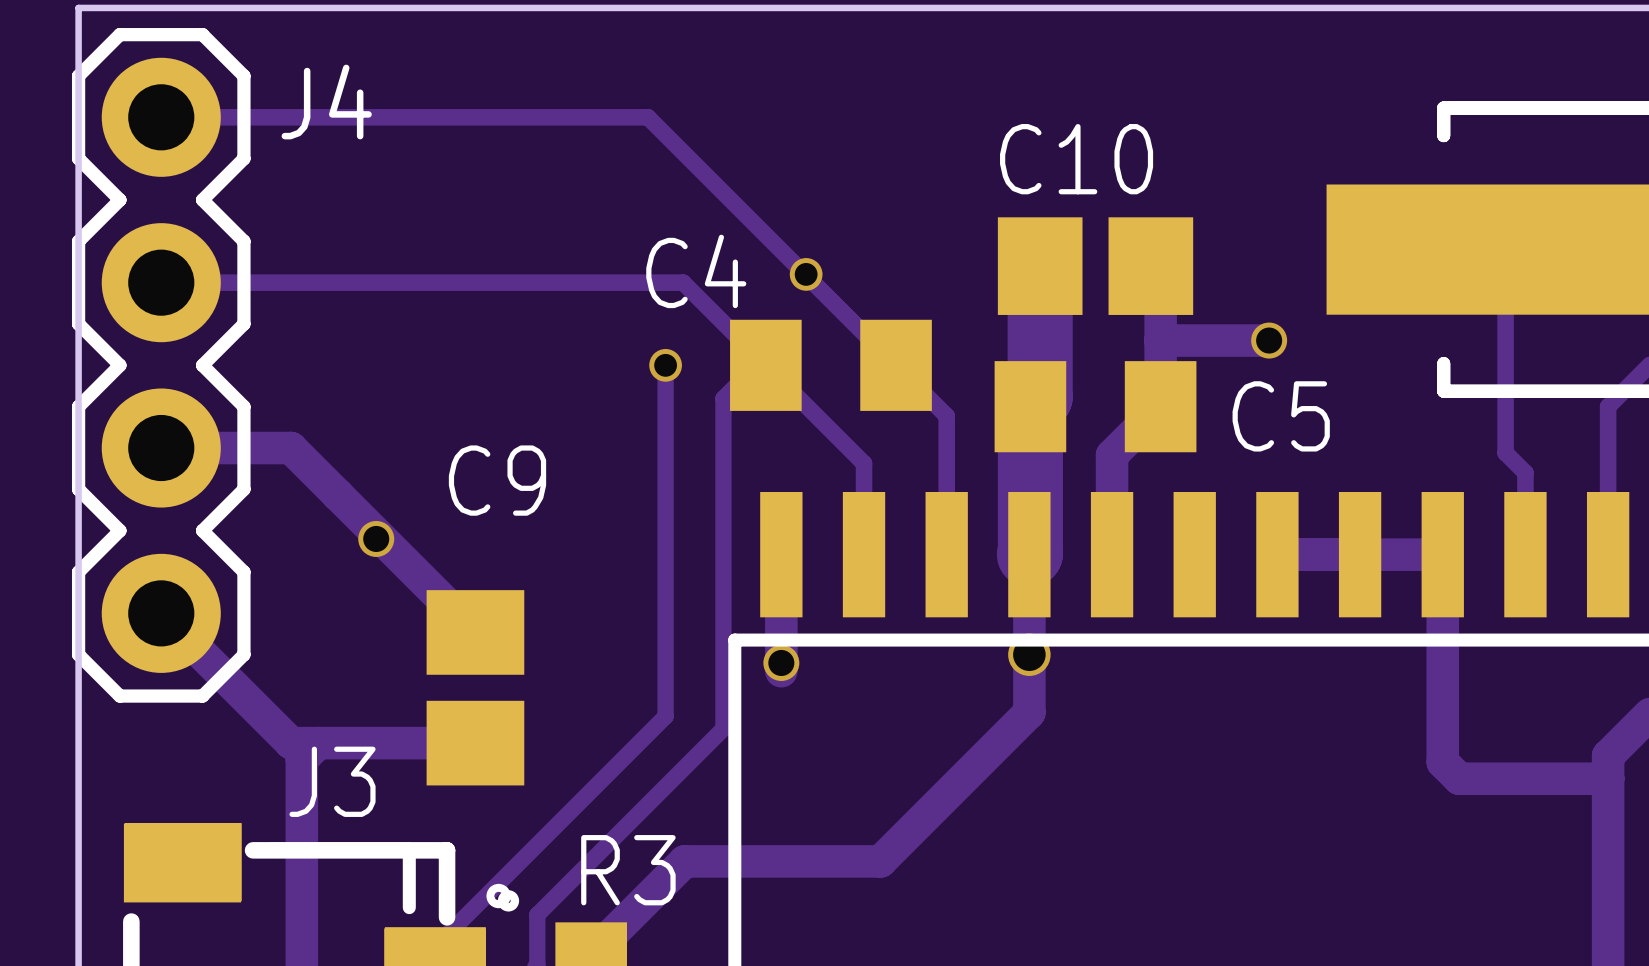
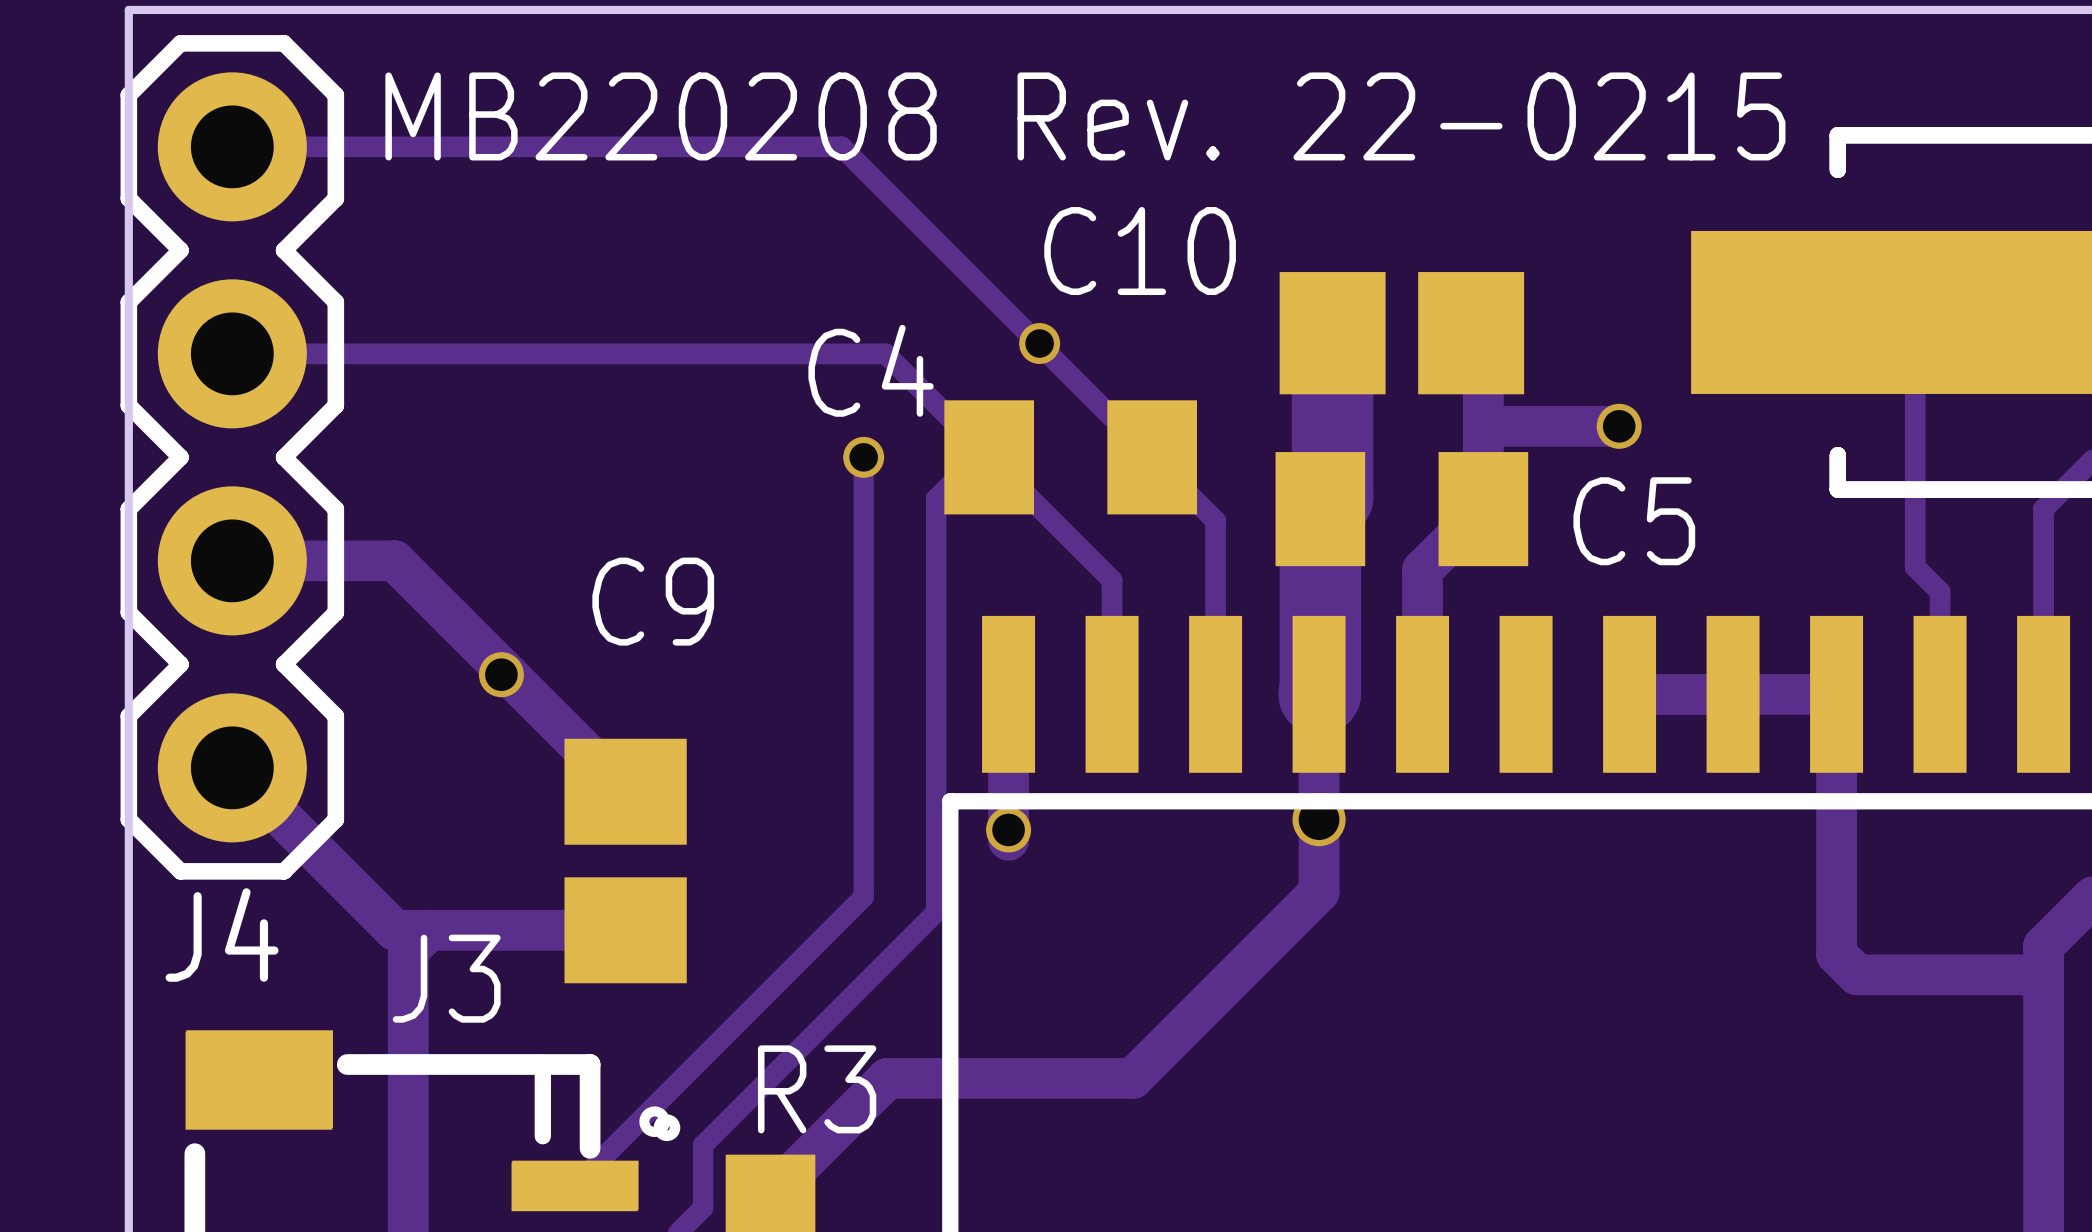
text: none -> MB220208 Rev. 22-0215 (1085, 116)
J4 name position: J4 (326, 102) -> J4 (222, 935)
C10 name position: C10 (1076, 159) -> C10 (1140, 251)
C4 name position: C4 (696, 271) -> C4 (871, 370)

